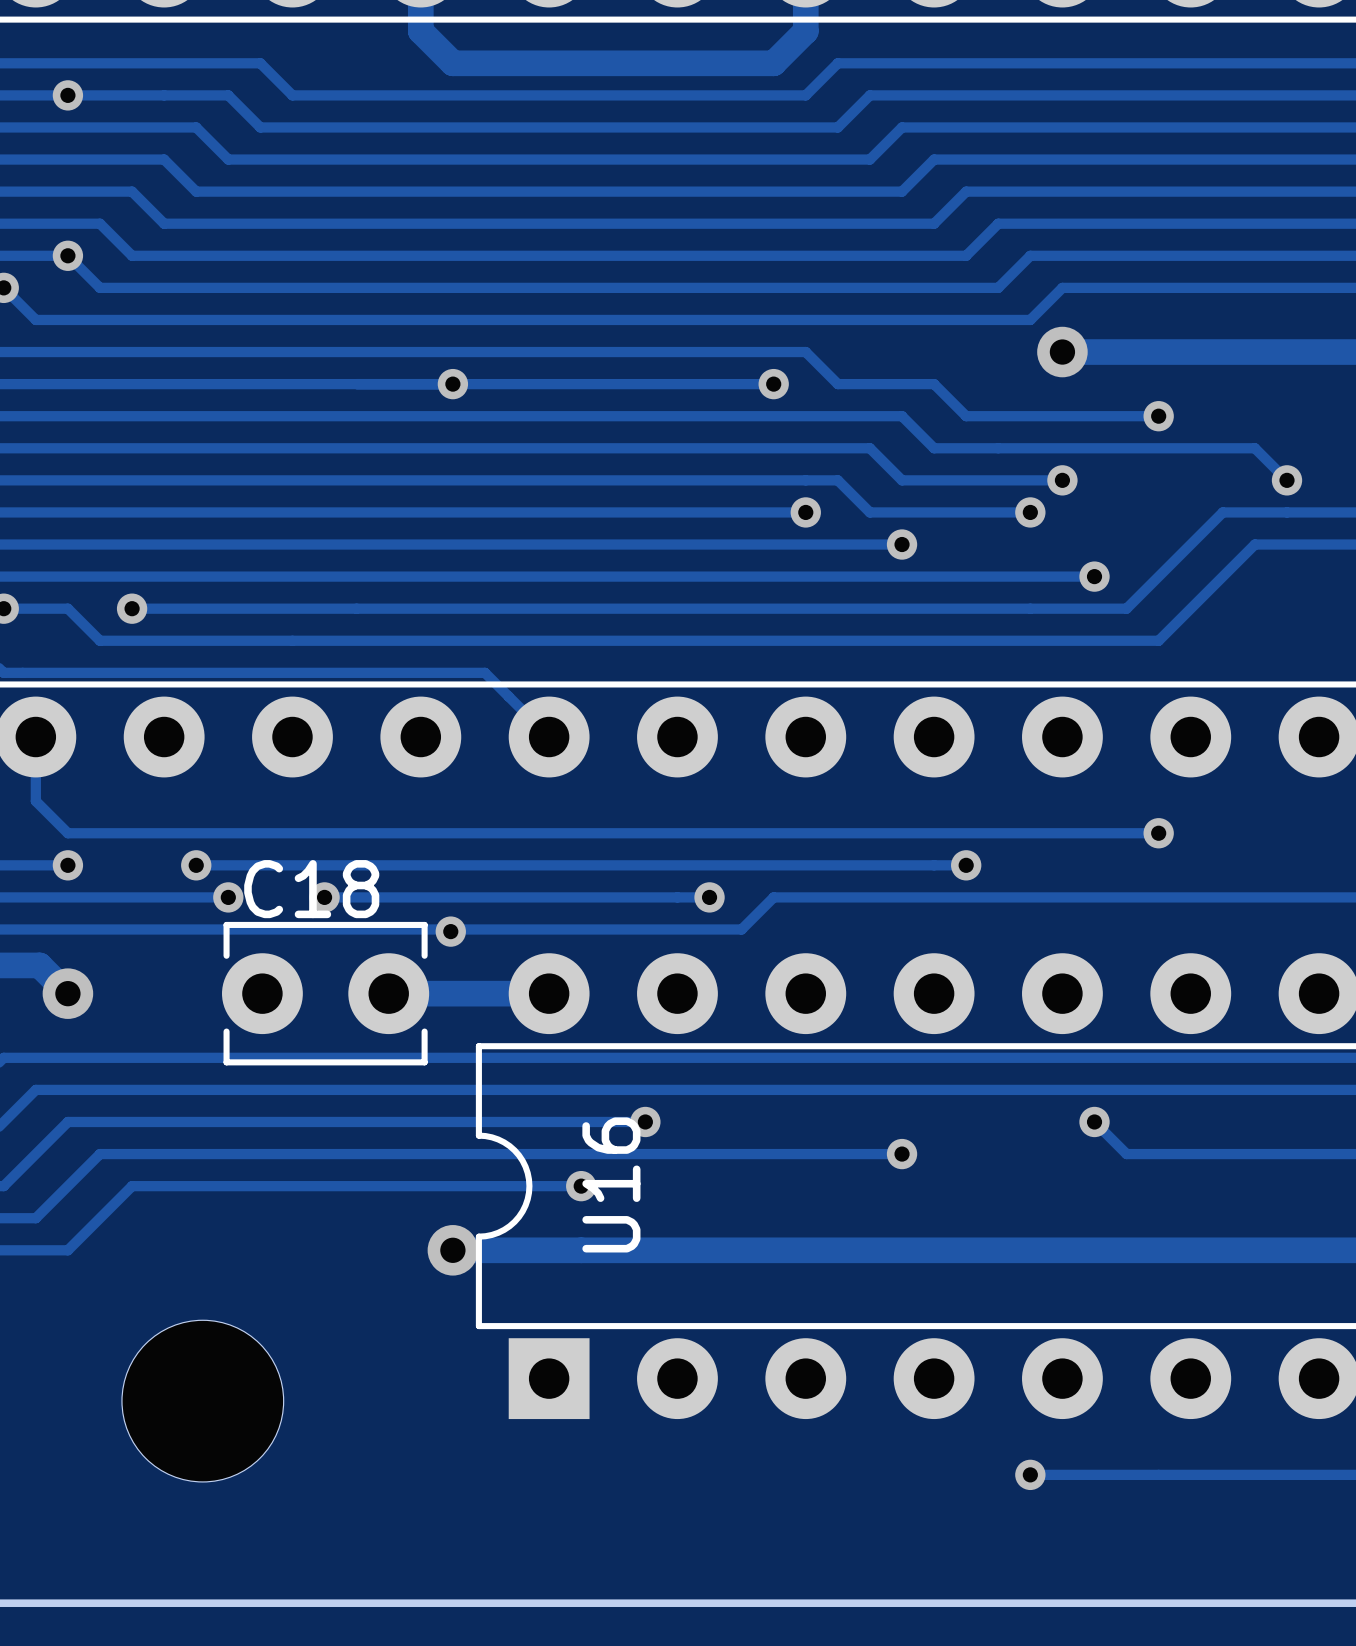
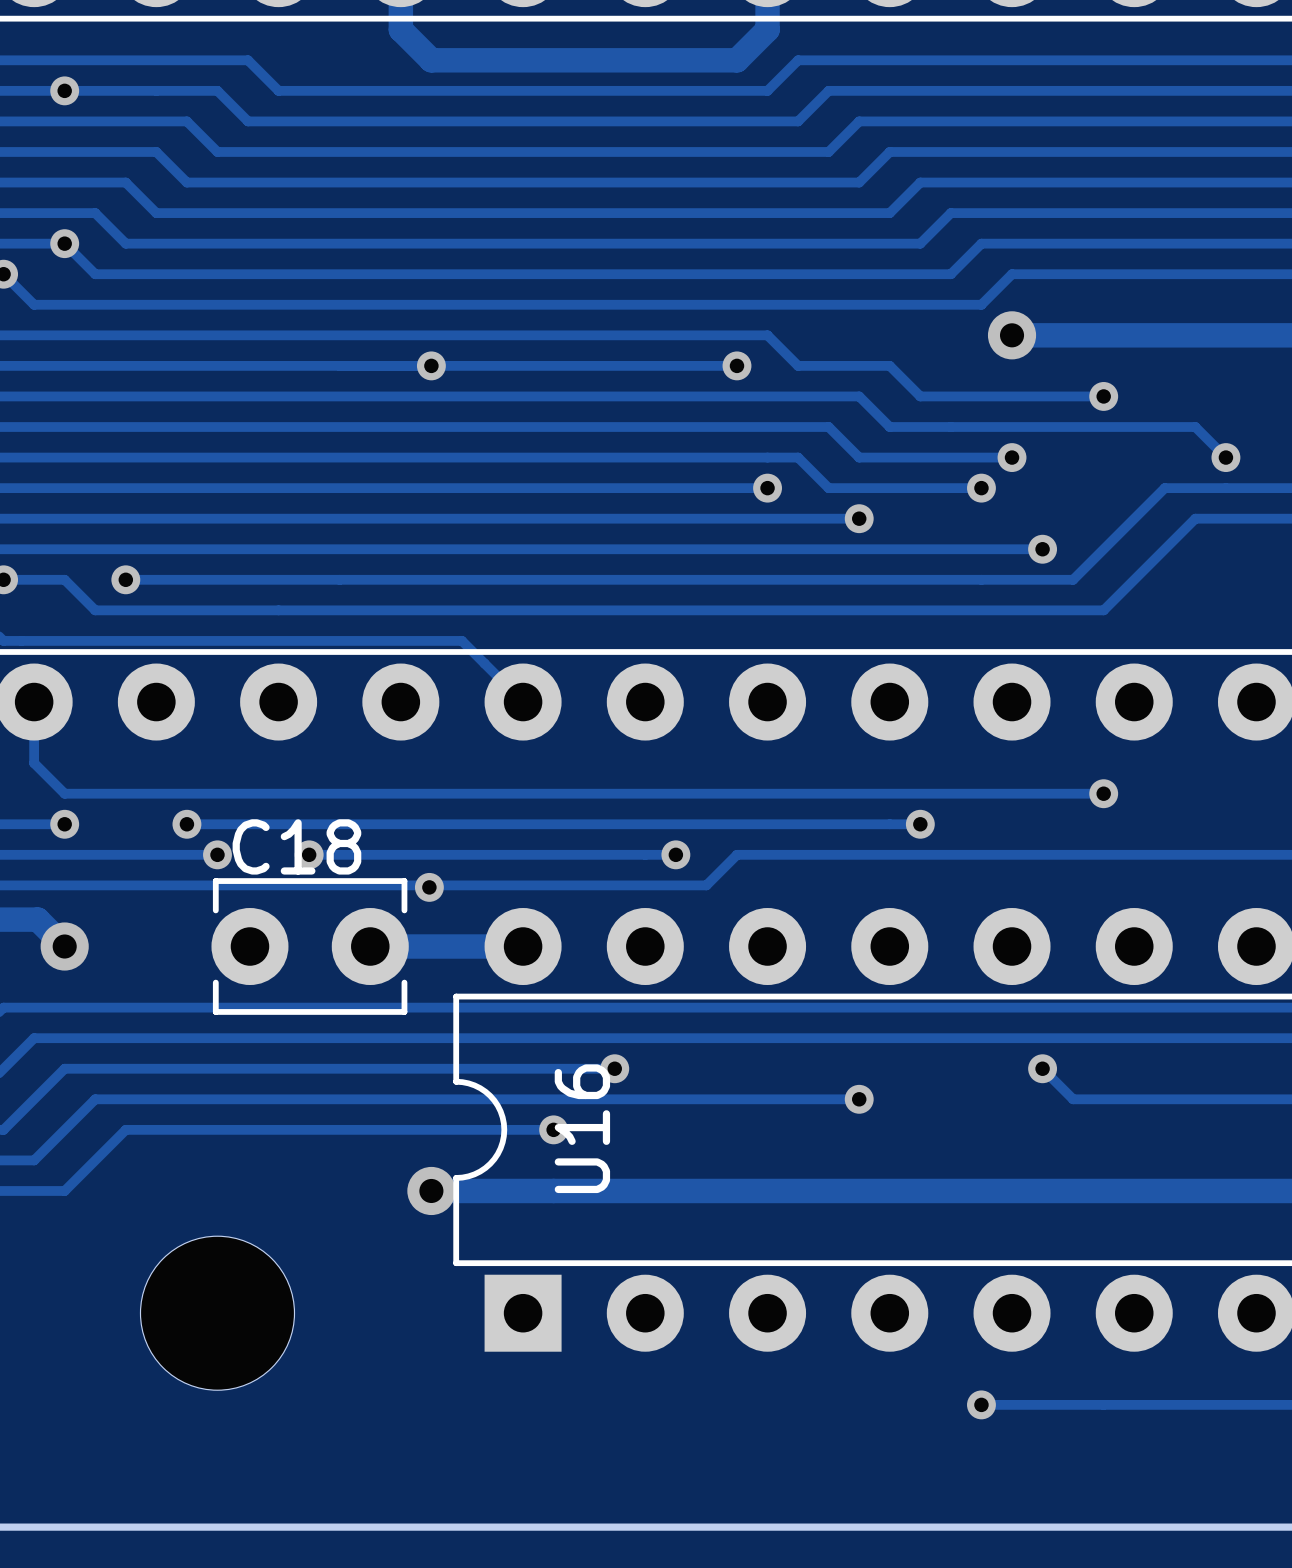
part position: (202, 1401) -> (217, 1313)

